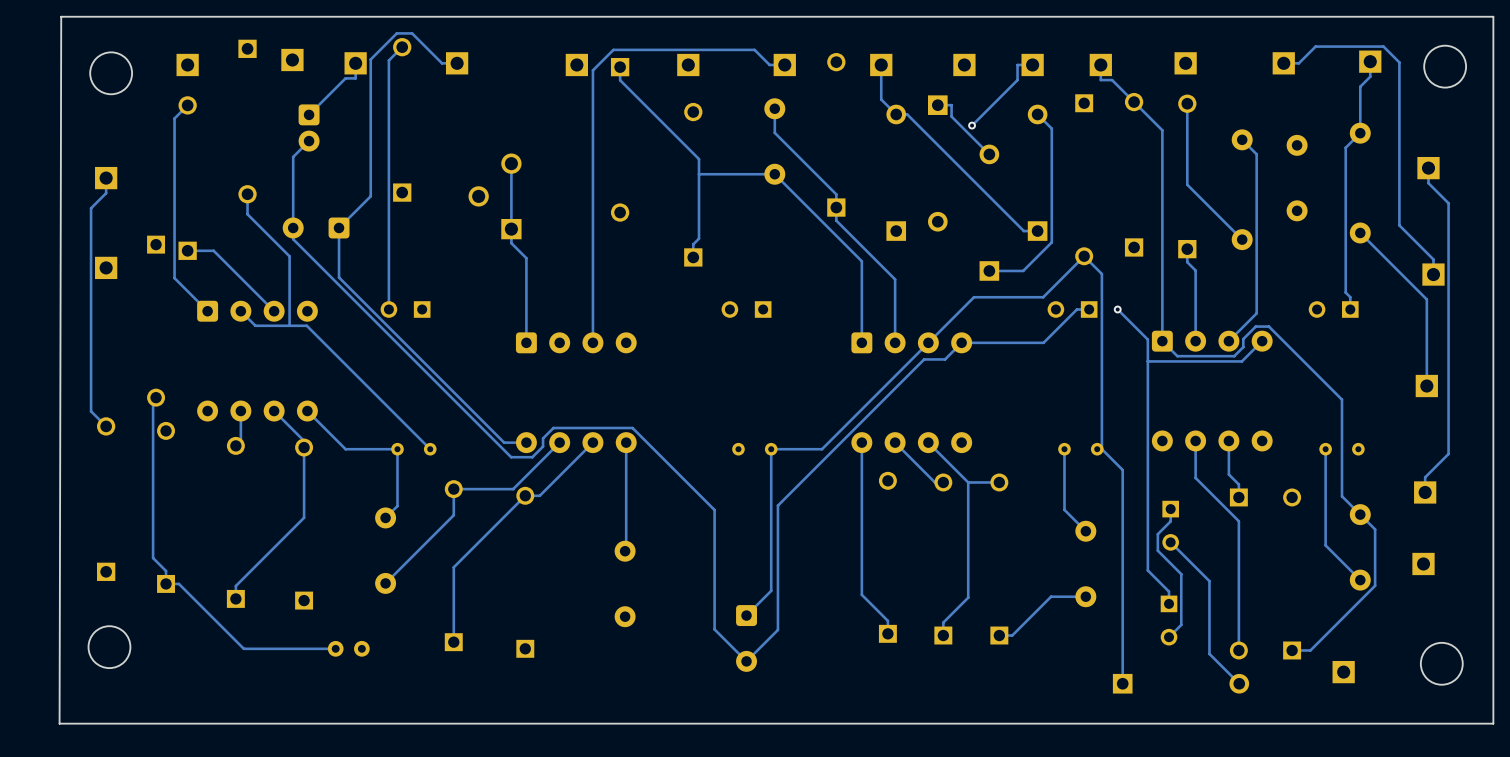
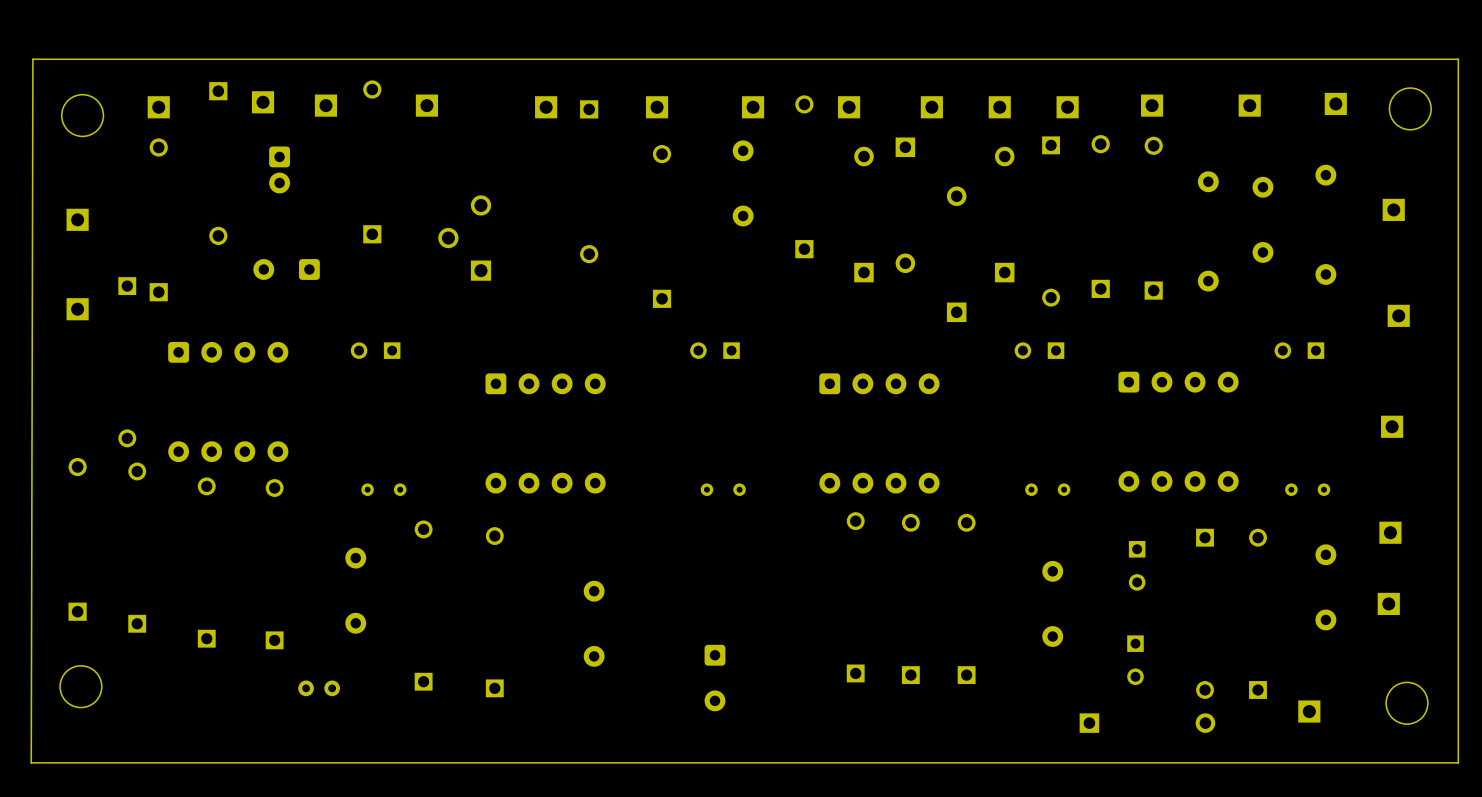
track: (402, 47) (388, 60) (388, 309) -> none
track: (1370, 61) (1370, 76) (1360, 86) (1360, 133) (1345, 147) (1345, 292) (1350, 297) (1350, 309) -> none
track: (355, 63) (355, 78) (345, 78) (309, 114) -> none
track: (457, 63) (442, 63) (412, 33) (396, 33) (370, 59) (370, 196) (339, 227) (339, 277) (504, 442) (526, 442) -> none
track: (1283, 63) (1298, 63) (1315, 46) (1383, 46) (1399, 62) (1399, 225) (1433, 259) (1433, 274) -> none
track: (784, 64) (769, 64) (754, 49) (613, 49) (592, 70) (592, 342) -> none
track: (881, 64) (881, 99) (896, 114) (907, 114) (1023, 231) (1037, 231) -> none
track: (1032, 64) (1017, 64) (1017, 80) (972, 125) -> none
track: (1100, 64) (1100, 80) (1112, 80) (1162, 130) (1162, 341) (1177, 356) (1234, 356) (1243, 347) (1243, 339) (1255, 326) (1268, 326) (1342, 399) (1342, 496) (1375, 529) (1375, 585) (1310, 650) (1292, 650) -> none
track: (620, 67) (620, 80) (699, 159) (699, 238) (693, 244) (693, 257) -> none
track: (1187, 103) (1187, 184) (1242, 239) -> none
track: (187, 105) (174, 118) (174, 278) (207, 311) -> none
track: (937, 105) (951, 105) (951, 116) (989, 154) -> none
track: (774, 108) (774, 132) (836, 194) (836, 220) (895, 279) (895, 342) -> none
track: (1037, 114) (1051, 128) (1051, 242) (1023, 270) (989, 270) -> none
via: (972, 125) -> none
track: (1242, 139) (1256, 154) (1256, 313) (1228, 341) -> none
track: (309, 141) (293, 156) (293, 239) (511, 457) (532, 457) (543, 446) (543, 438) (553, 428) (632, 428) (714, 510) (714, 629) (746, 661) (777, 629) (777, 505) (924, 359) (945, 359) (961, 342) (1043, 342) (1076, 309) (1089, 309) -> none
track: (511, 163) (511, 243) (526, 258) (526, 342) -> none
track: (1428, 168) (1428, 183) (1448, 203) (1448, 453) (1425, 477) (1425, 492) -> none
track: (699, 174) (774, 174) (861, 261) (861, 342) -> none
track: (106, 178) (106, 193) (91, 208) (91, 411) (106, 426) -> none
track: (247, 194) (247, 214) (289, 256) (289, 325) -> none
track: (1360, 232) (1426, 299) (1426, 386) -> none
track: (1187, 249) (1187, 262) (1195, 270) (1195, 341) -> none
track: (187, 250) (213, 250) (274, 311) -> none
track: (1117, 309) (1147, 339) (1147, 570) (1169, 591) (1169, 603) -> none
via: (1117, 309) -> none
track: (240, 311) (255, 325) (306, 325) (430, 449) -> none
track: (1262, 341) (1241, 361) (1147, 361) -> none
track: (156, 397) (153, 400) (153, 558) (166, 571) (166, 583) (178, 583) (243, 648) (335, 648) -> none
track: (240, 411) (240, 440) (235, 445) -> none
track: (274, 411) (304, 440) (304, 517) (235, 585) (235, 598) -> none
track: (307, 411) (345, 449) (397, 449) (397, 506) (385, 517) -> none
track: (1195, 440) (1195, 477) (1238, 521) (1238, 650) -> none
track: (1228, 440) (1228, 474) (1238, 484) (1238, 497) -> none
track: (559, 442) (513, 489) (453, 489) (453, 515) (385, 583) -> none
track: (592, 442) (539, 495) (525, 495) (453, 567) (453, 642) -> none
track: (626, 442) (625, 551) -> none
track: (861, 442) (861, 594) (887, 620) (887, 633) -> none
track: (895, 442) (934, 482) (943, 482) -> none
track: (928, 442) (968, 482) -> none
track: (1064, 449) (1064, 509) (1085, 531) -> none
track: (1101, 449) (1122, 470) (1122, 683) -> none
track: (1101, 449) (1101, 273) (1084, 256) (1043, 297) (973, 297) (822, 449) (771, 449) (771, 590) (746, 615) -> none
track: (1325, 449) (1325, 545) (1360, 580) -> none
track: (968, 482) (968, 597) (943, 622) (943, 635) -> none
track: (999, 482) (968, 482) -> none
track: (1170, 509) (1170, 521) (1157, 534) (1157, 550) (1181, 574) (1181, 624) (1169, 637) -> none
track: (1170, 542) (1209, 581) (1209, 653) (1239, 683) -> none
track: (1085, 596) (1051, 596) (1012, 635) (999, 635) -> none

